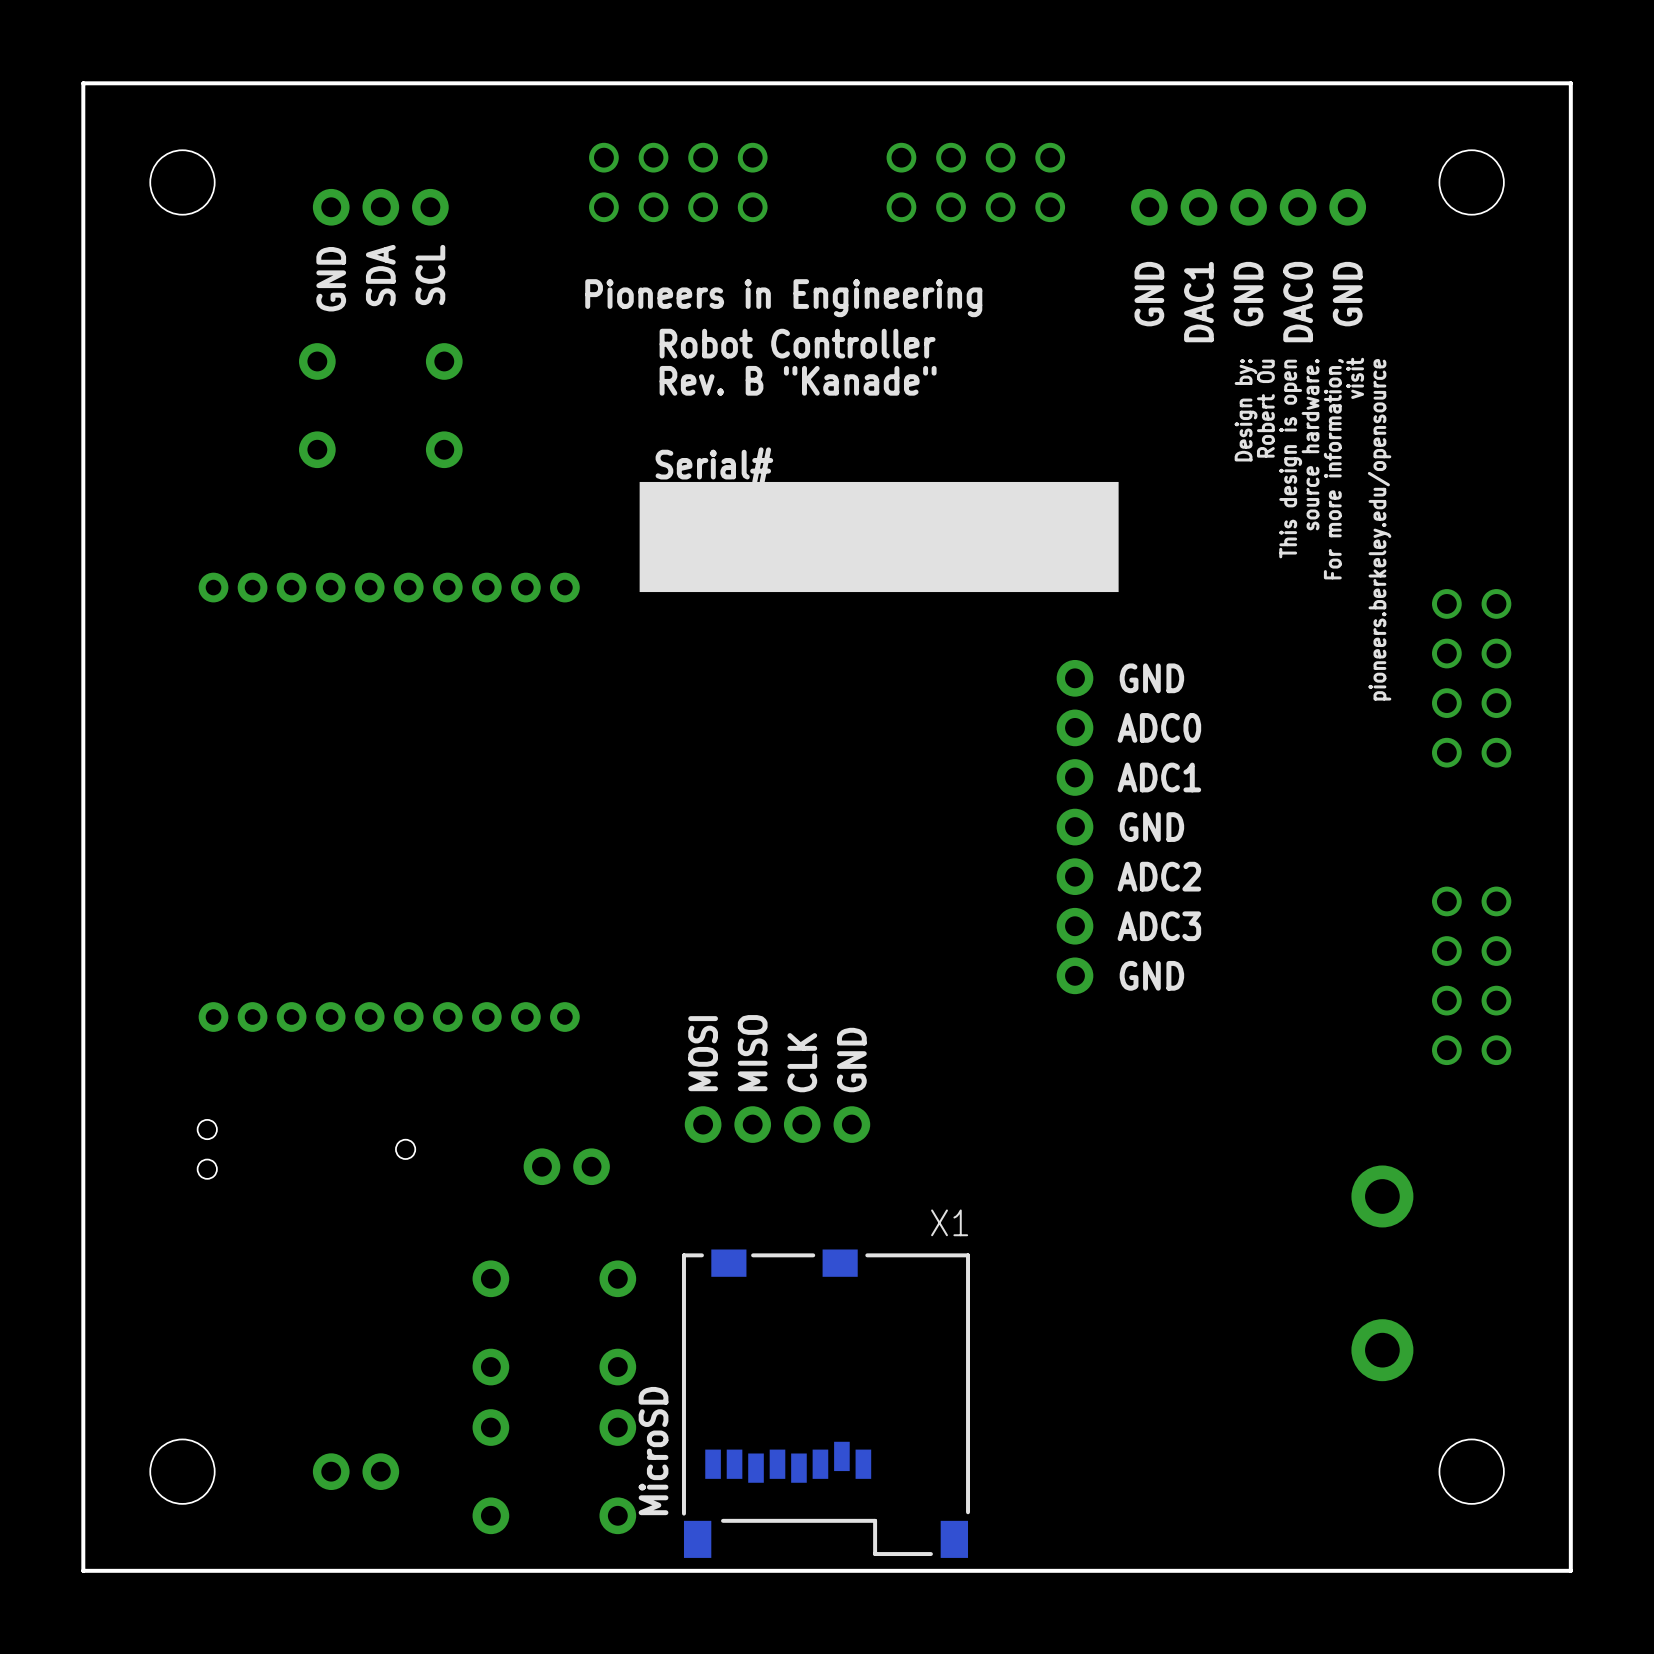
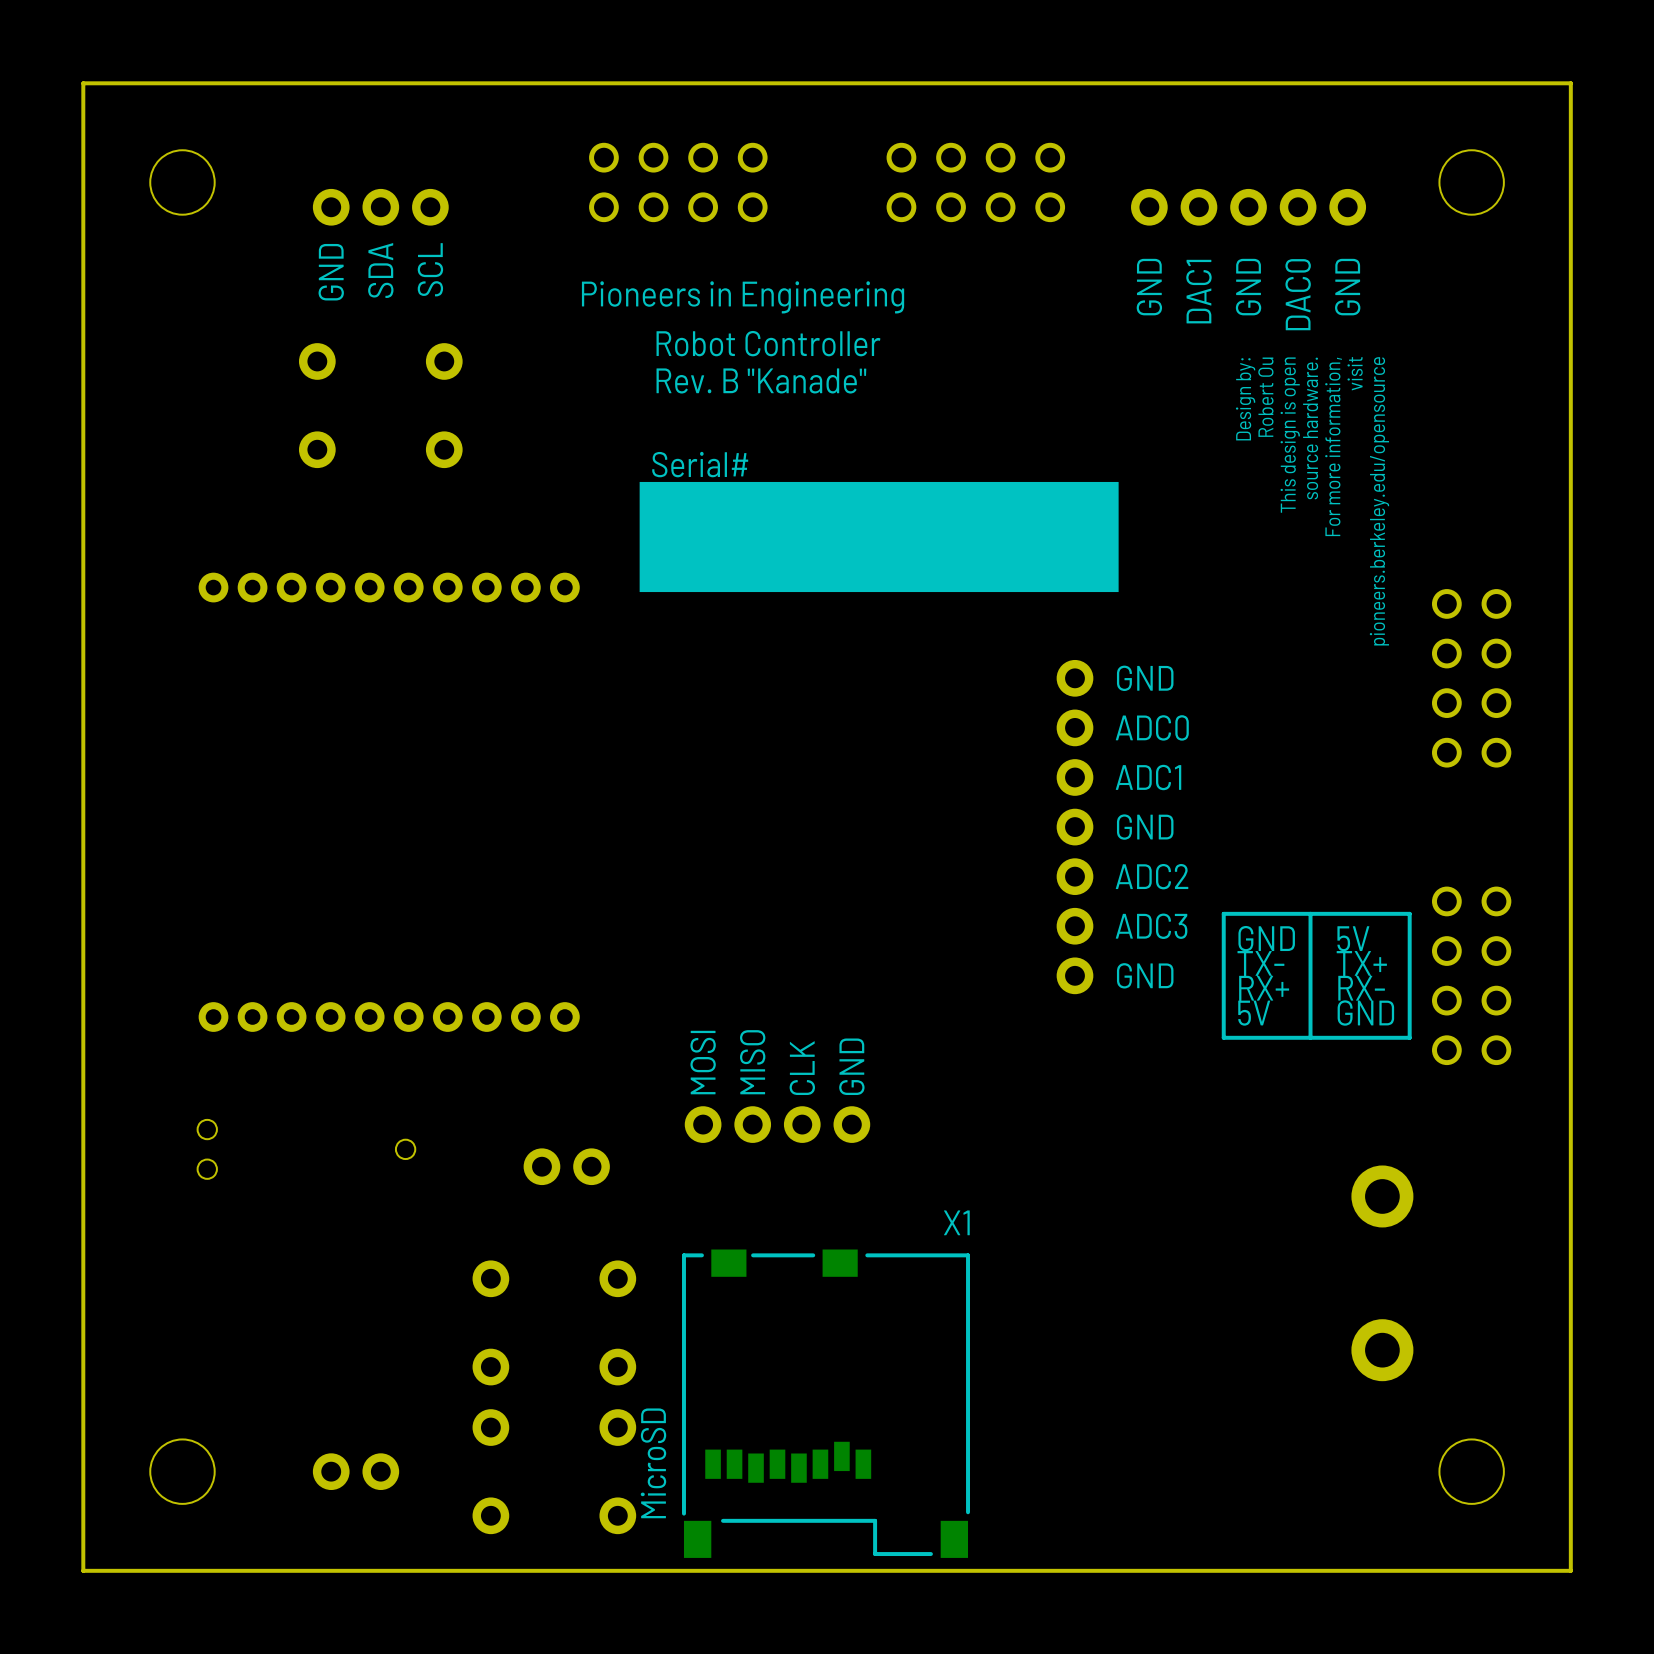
line: none -> (1310, 913) (1310, 1037)
line: none -> (1409, 913) (1223, 913) (1223, 1037) (1409, 1037) (1409, 913)
text: none -> GND (1266, 938)
text: none -> 5V (1353, 938)
text: none -> TX- (1260, 963)
text: none -> TX+ (1361, 963)
text: none -> RX+ (1264, 988)
text: none -> RX- (1361, 988)
text: none -> 5V (1254, 1013)
text: none -> GND (1365, 1013)

